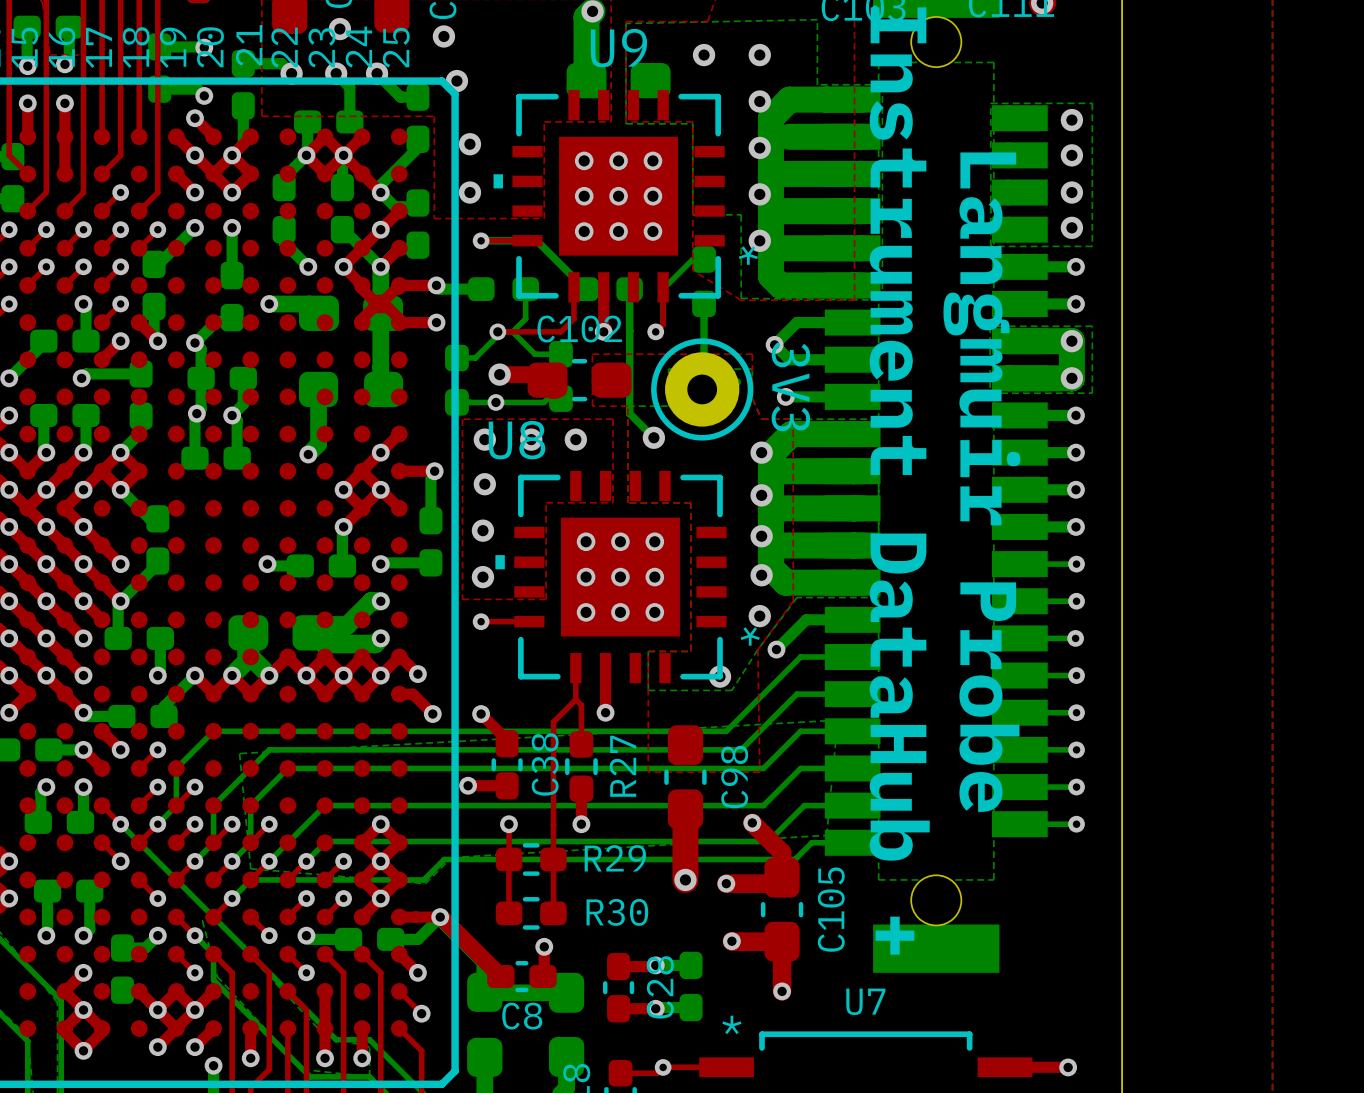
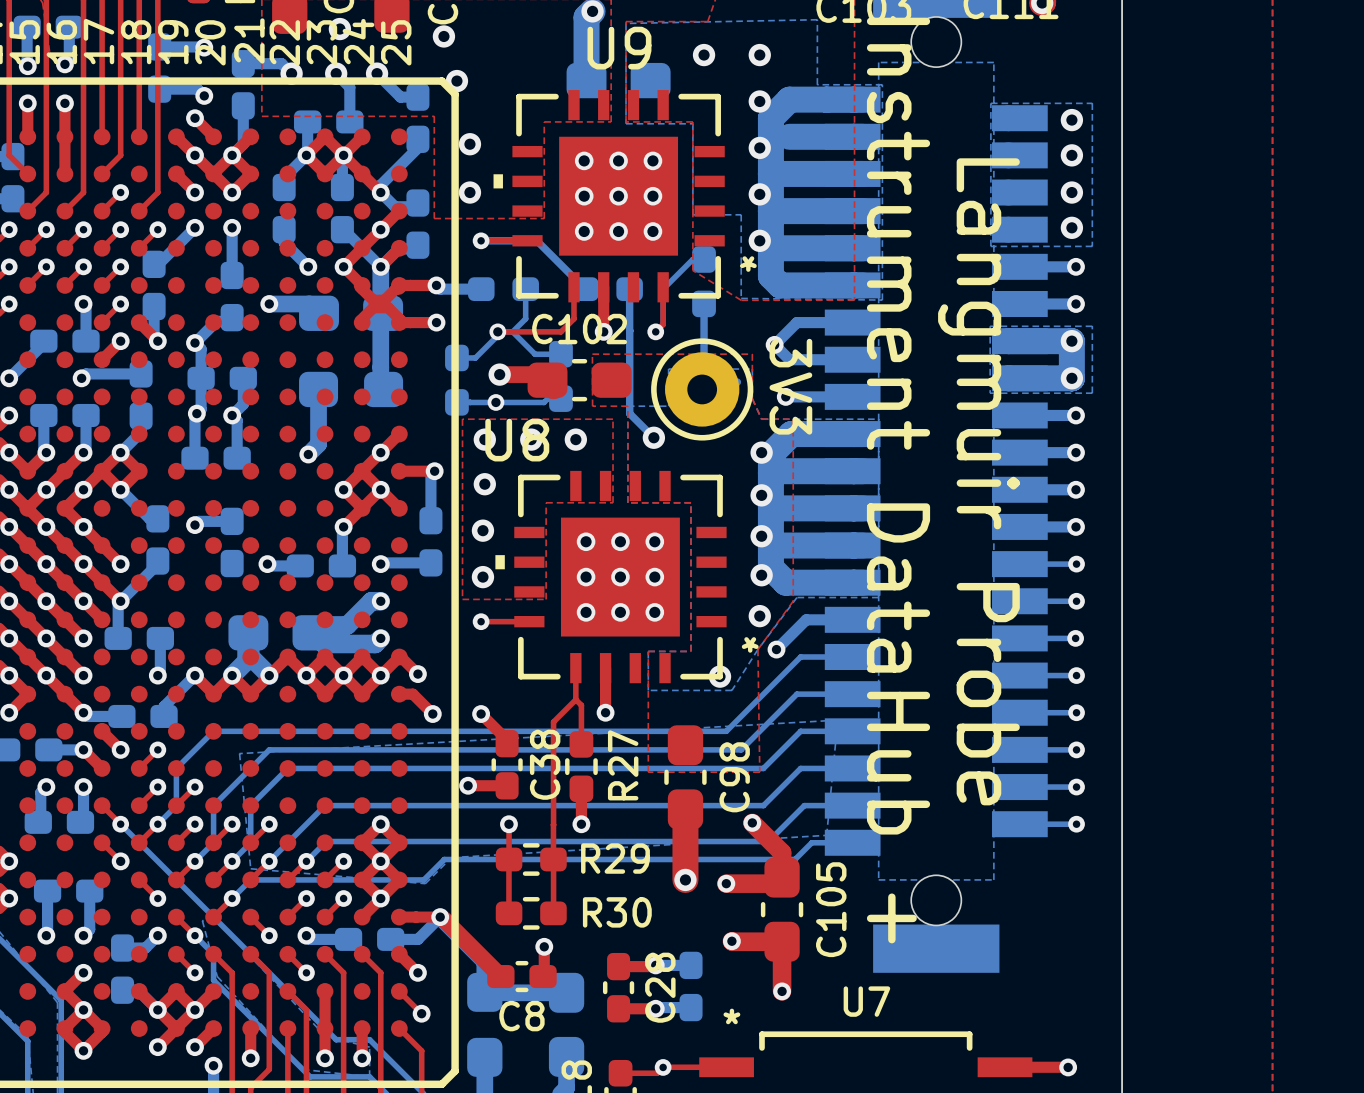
bottom track: none -> (232, 521) (198, 521) (194, 525)
via: none -> (194, 525)
part: none -> (232, 542)

